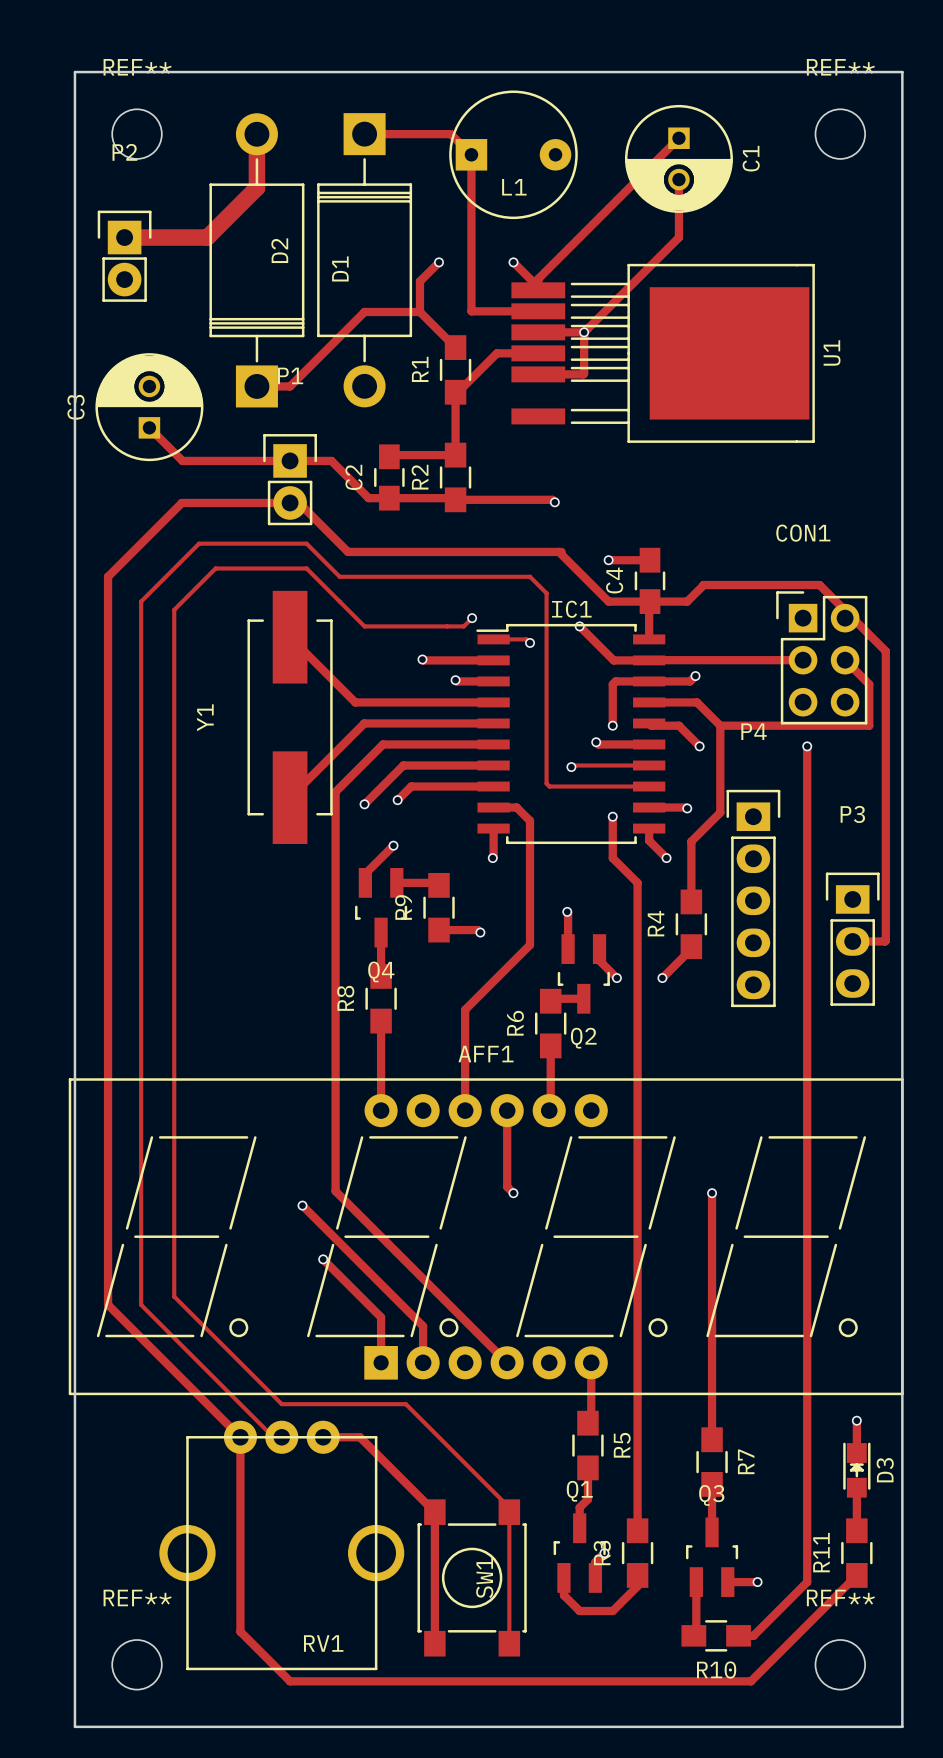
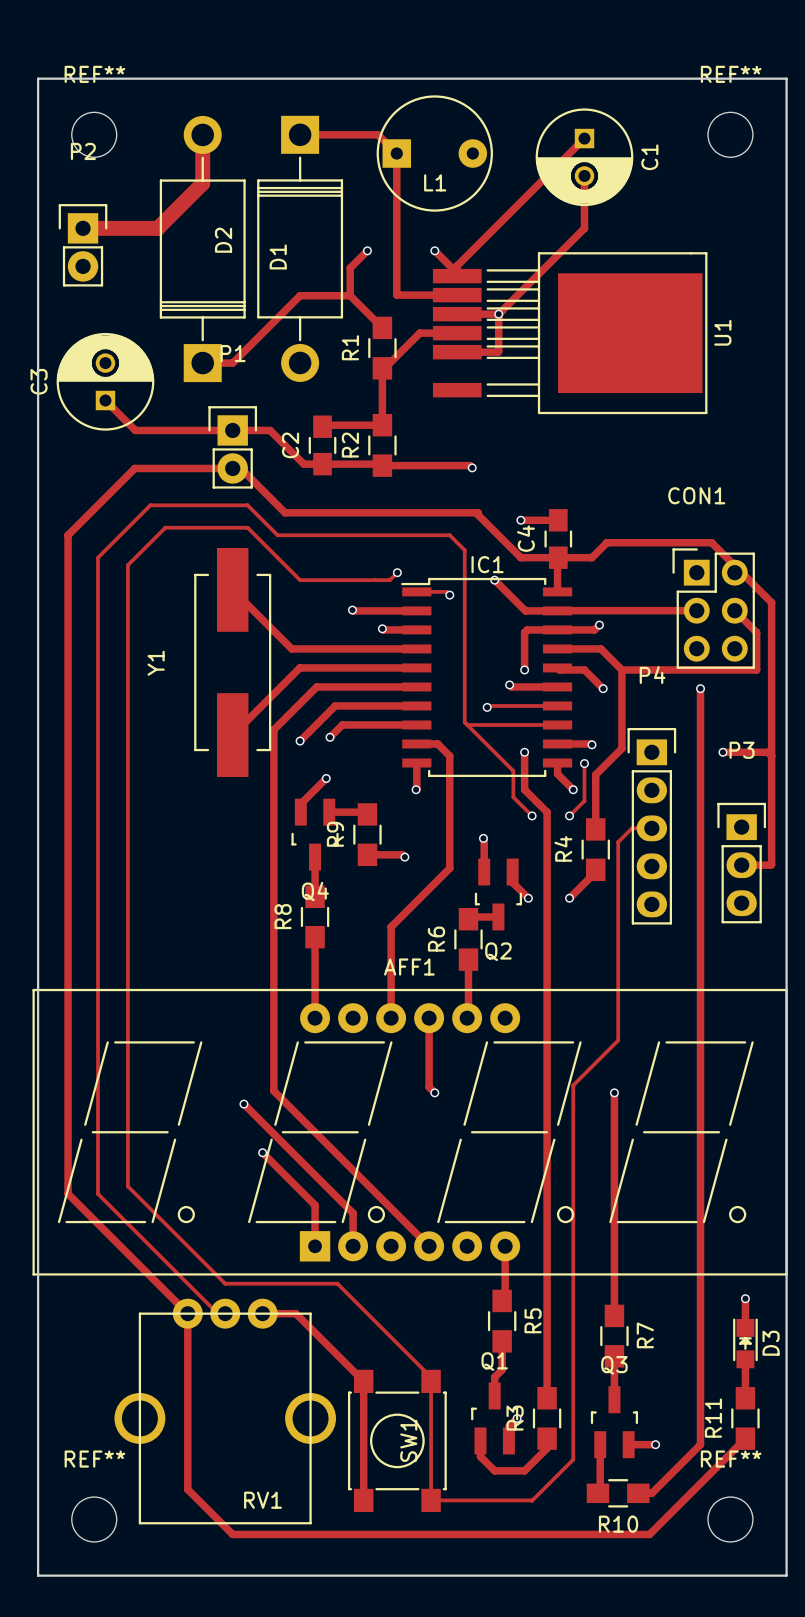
track: none -> (467, 724) (513, 771) (513, 797) (532, 815)
track: none -> (722, 752) (767, 752) (771, 756)
via: none -> (722, 752)
track: none -> (584, 763) (584, 800) (569, 815)
via: none -> (584, 763)
via: none -> (532, 815)
via: none -> (569, 815)
track: none -> (651, 828) (631, 828) (618, 842) (618, 1040) (573, 1085) (573, 1459) (532, 1500) (431, 1500)

